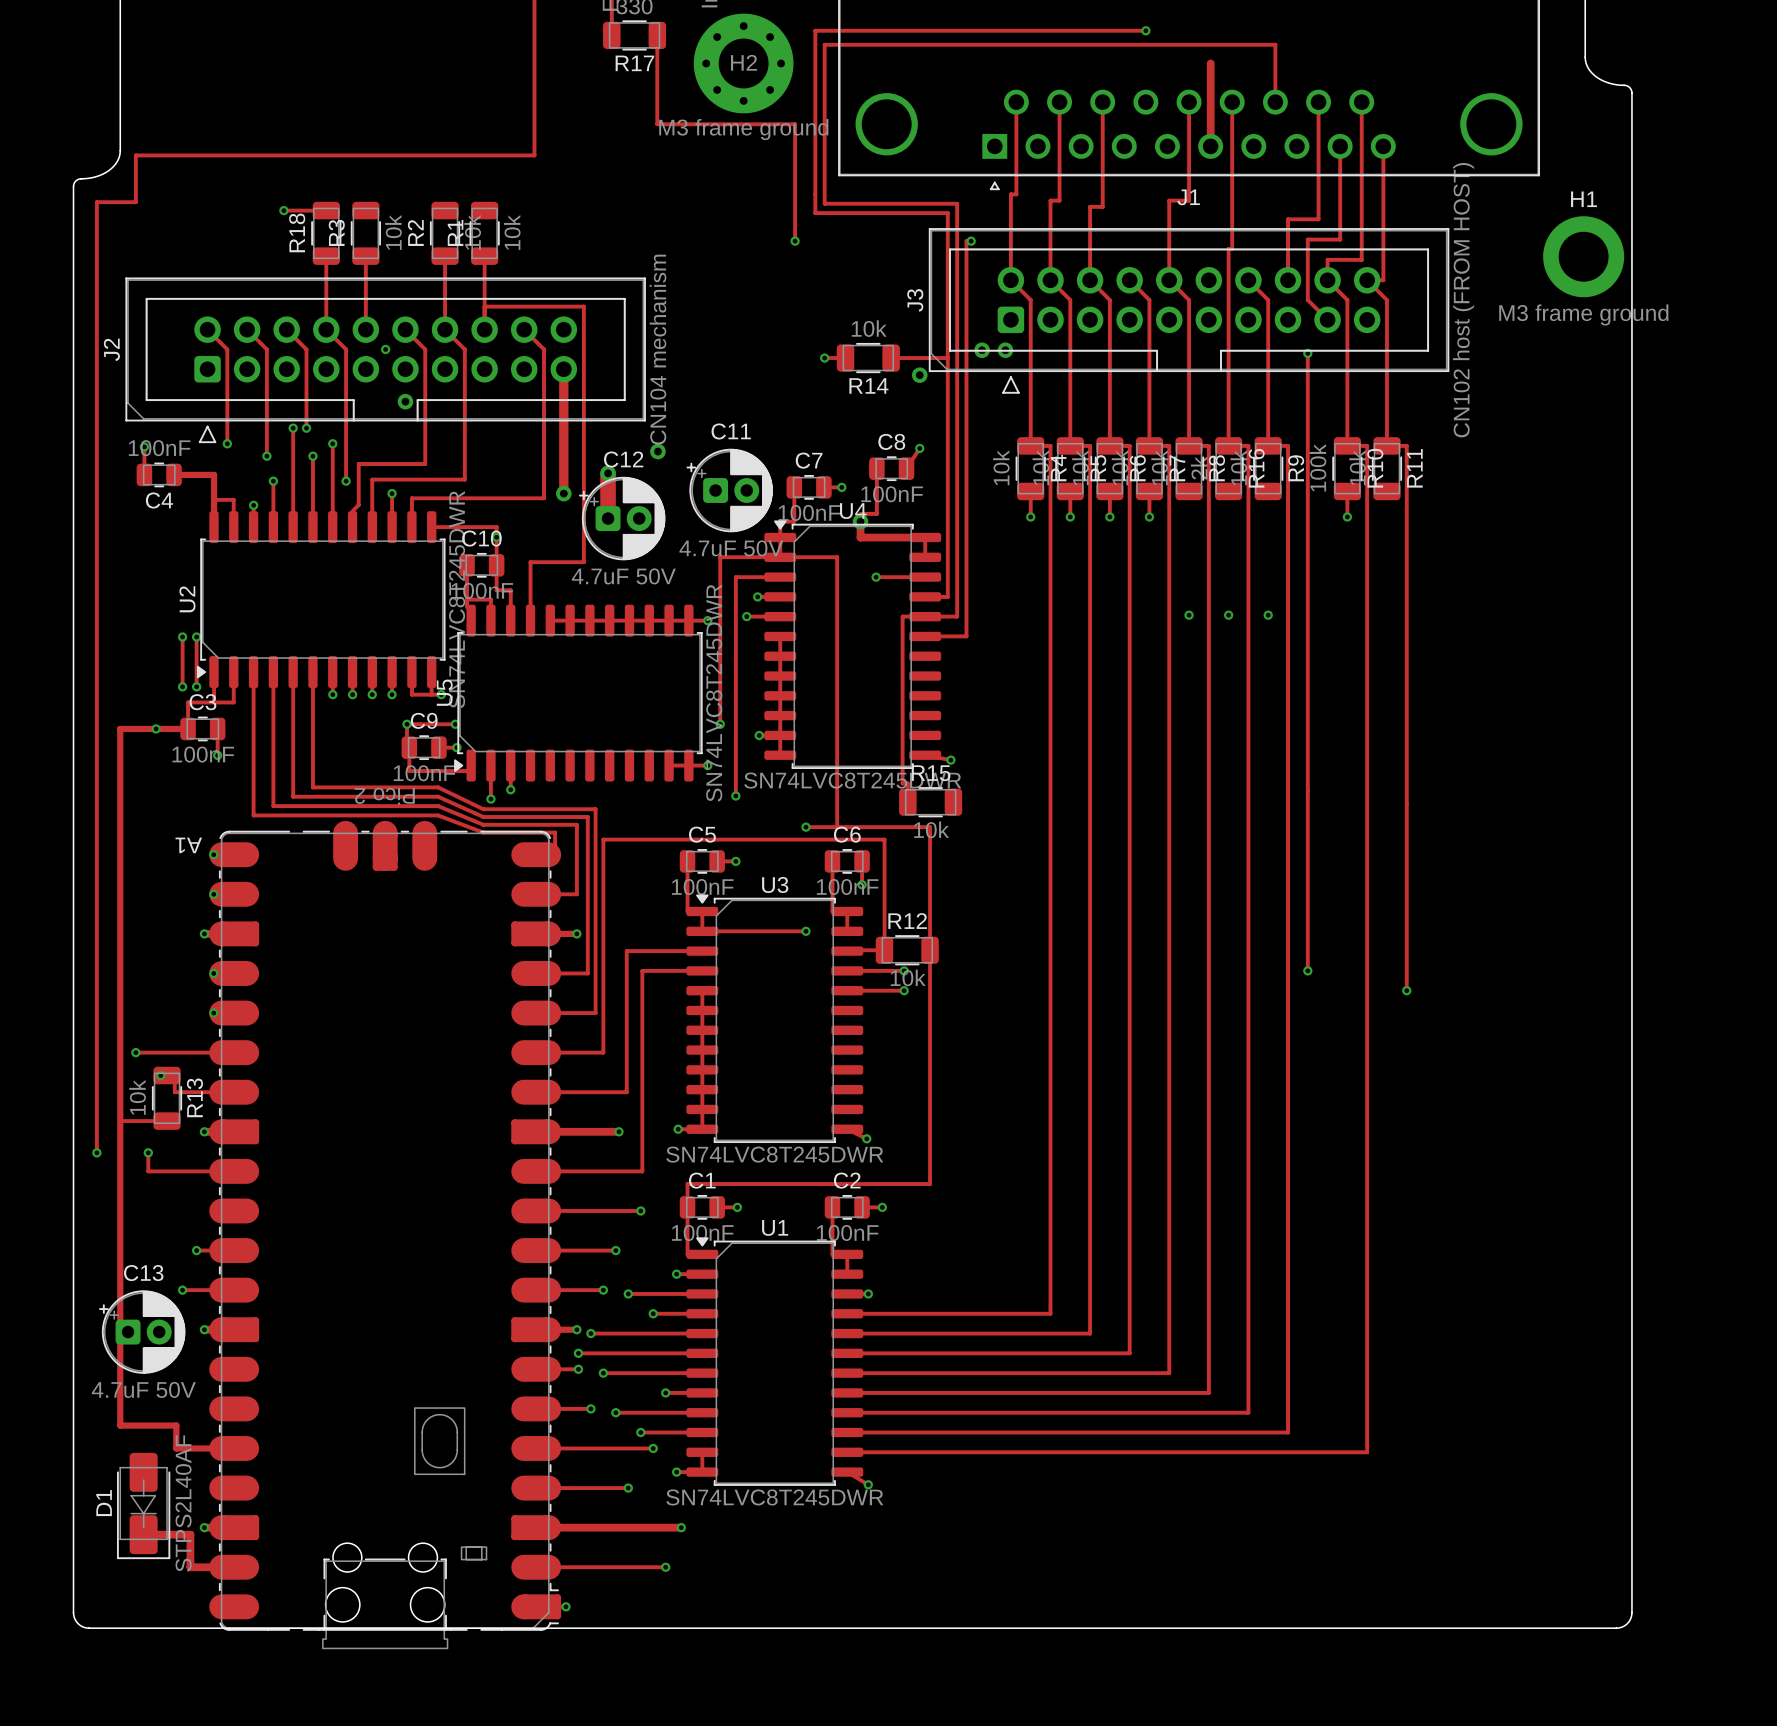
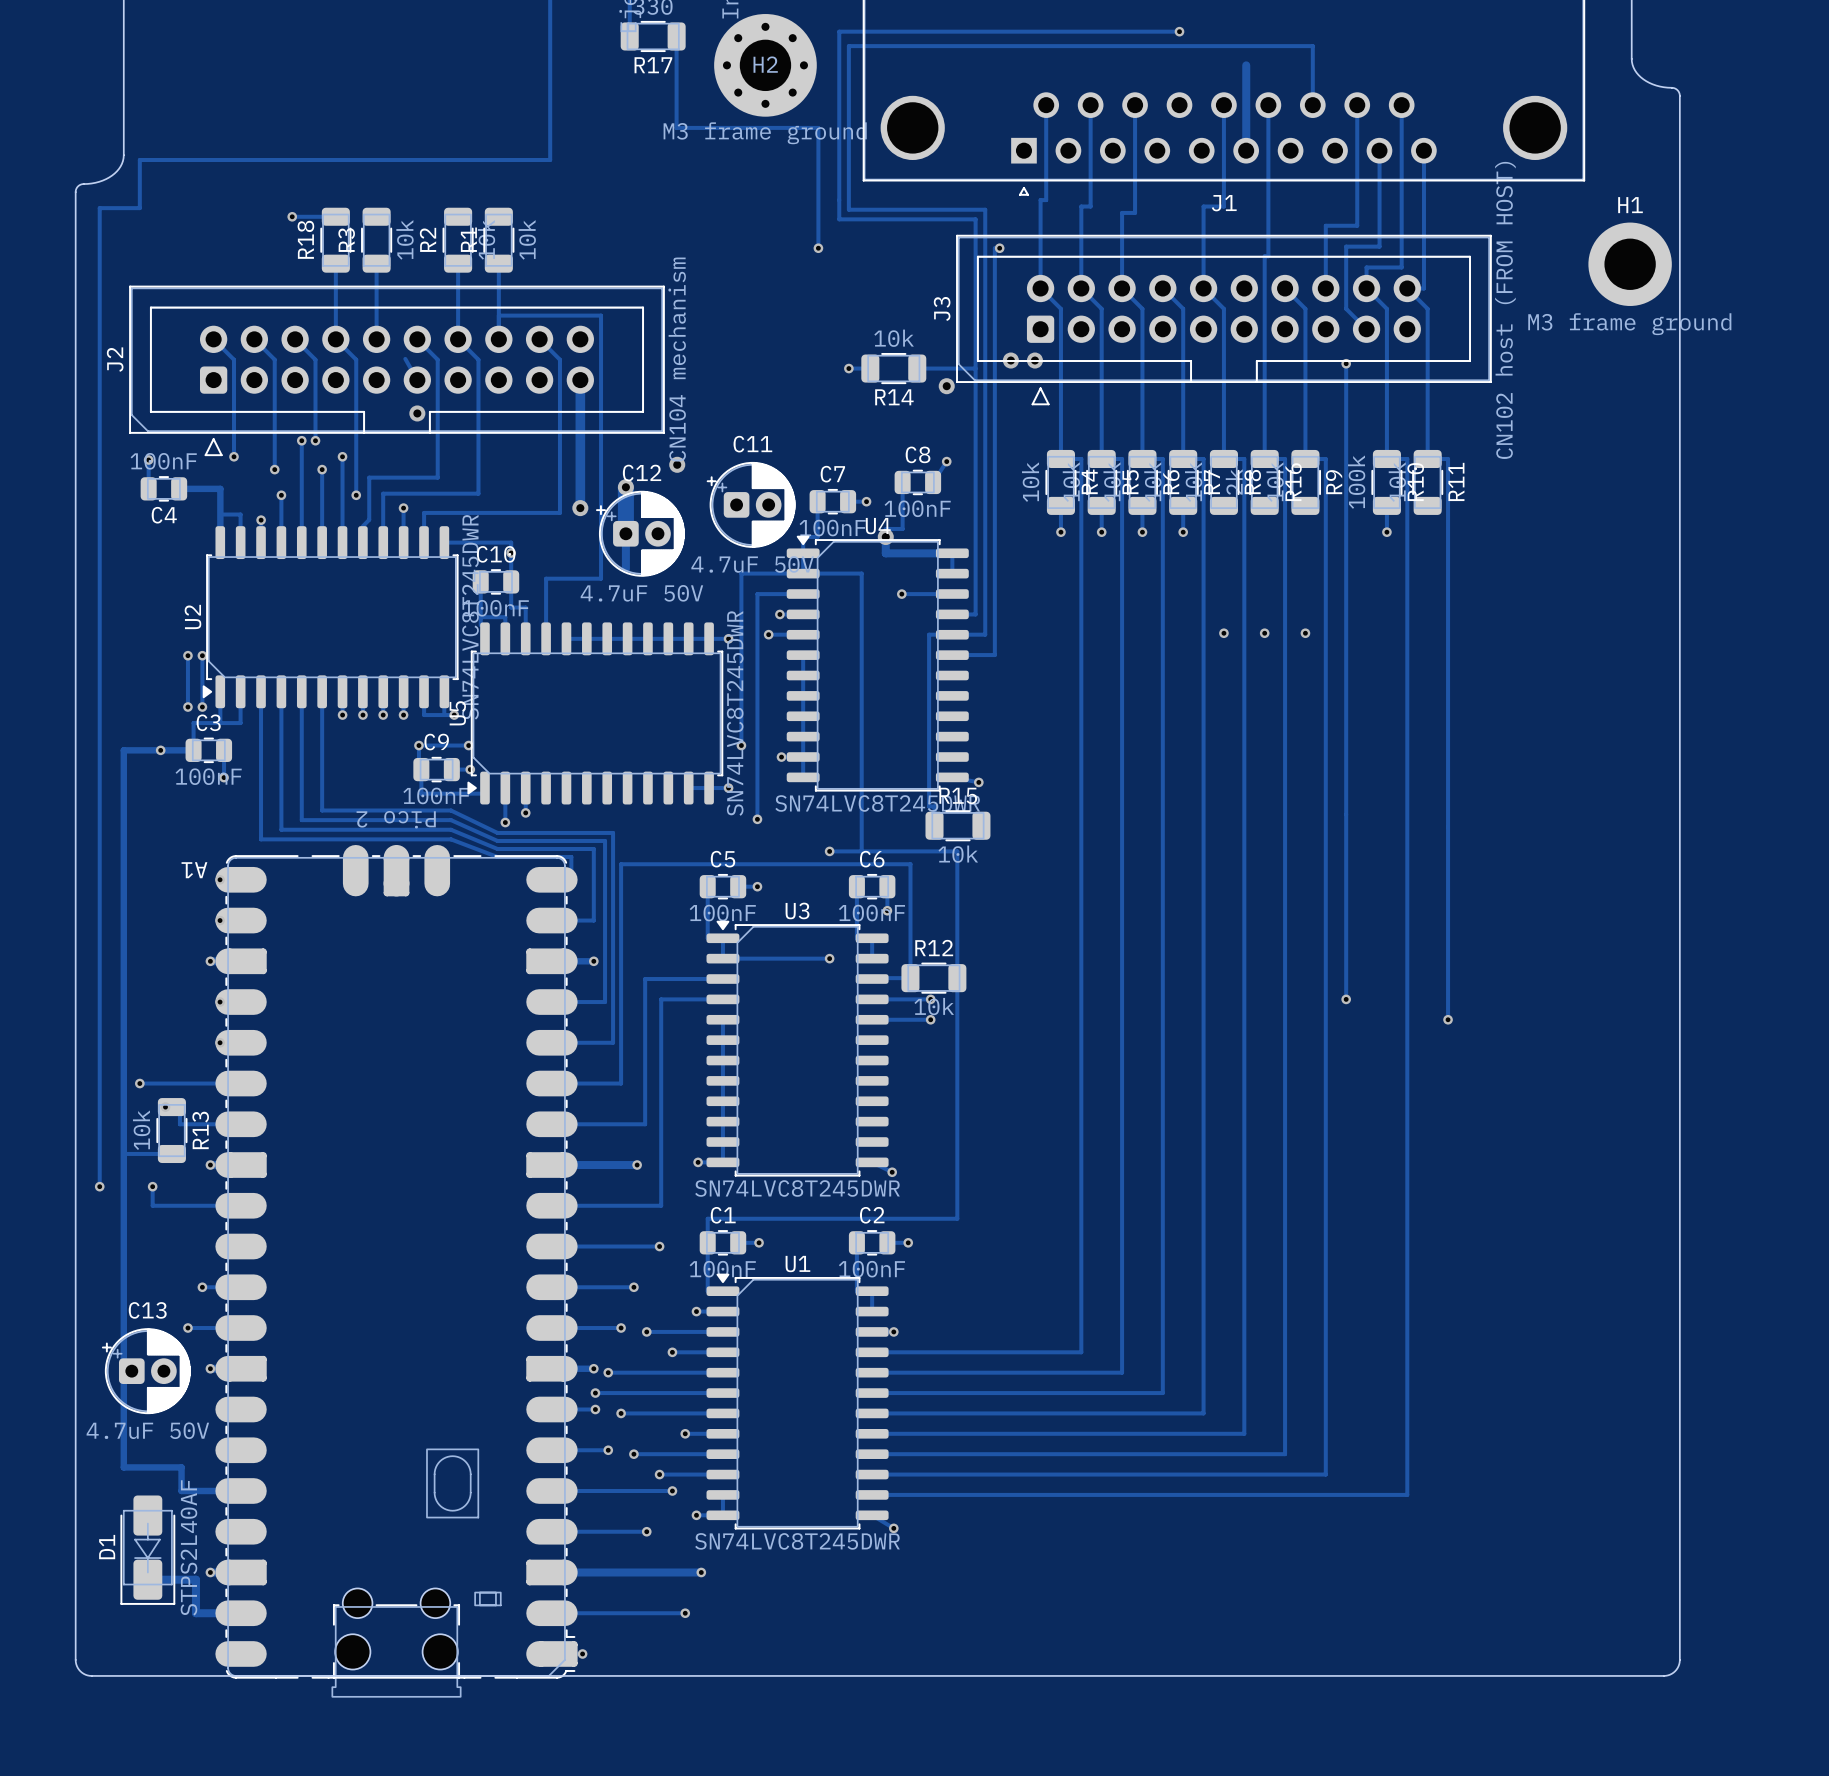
track: none -> (405, 358) (417, 380)
via: (385, 349) -> none
track: none -> (625, 533) (625, 569)

